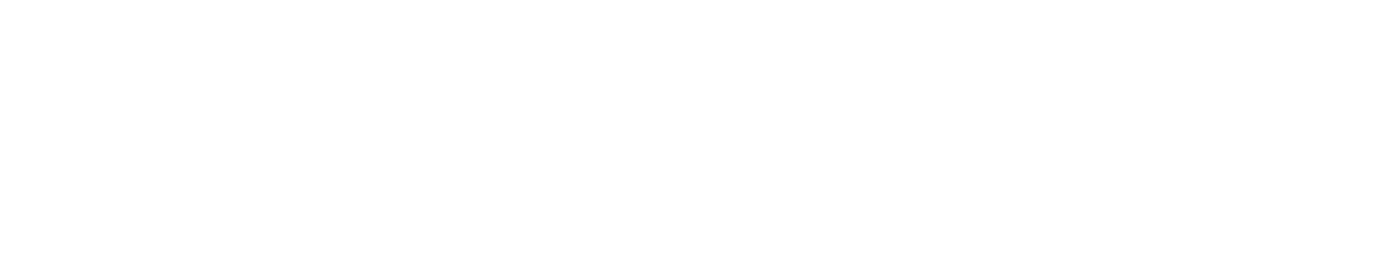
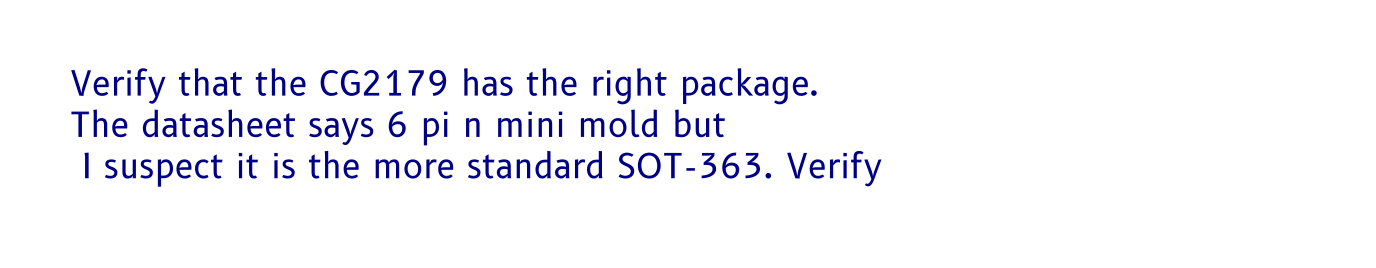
text: none -> Verify that the CG2179 has the right package. (443, 86)
text: none -> The datasheet says 6 pi n mini mold but (398, 127)
text: none -> I suspect it is the more standard SOT-363. Verify (483, 168)

